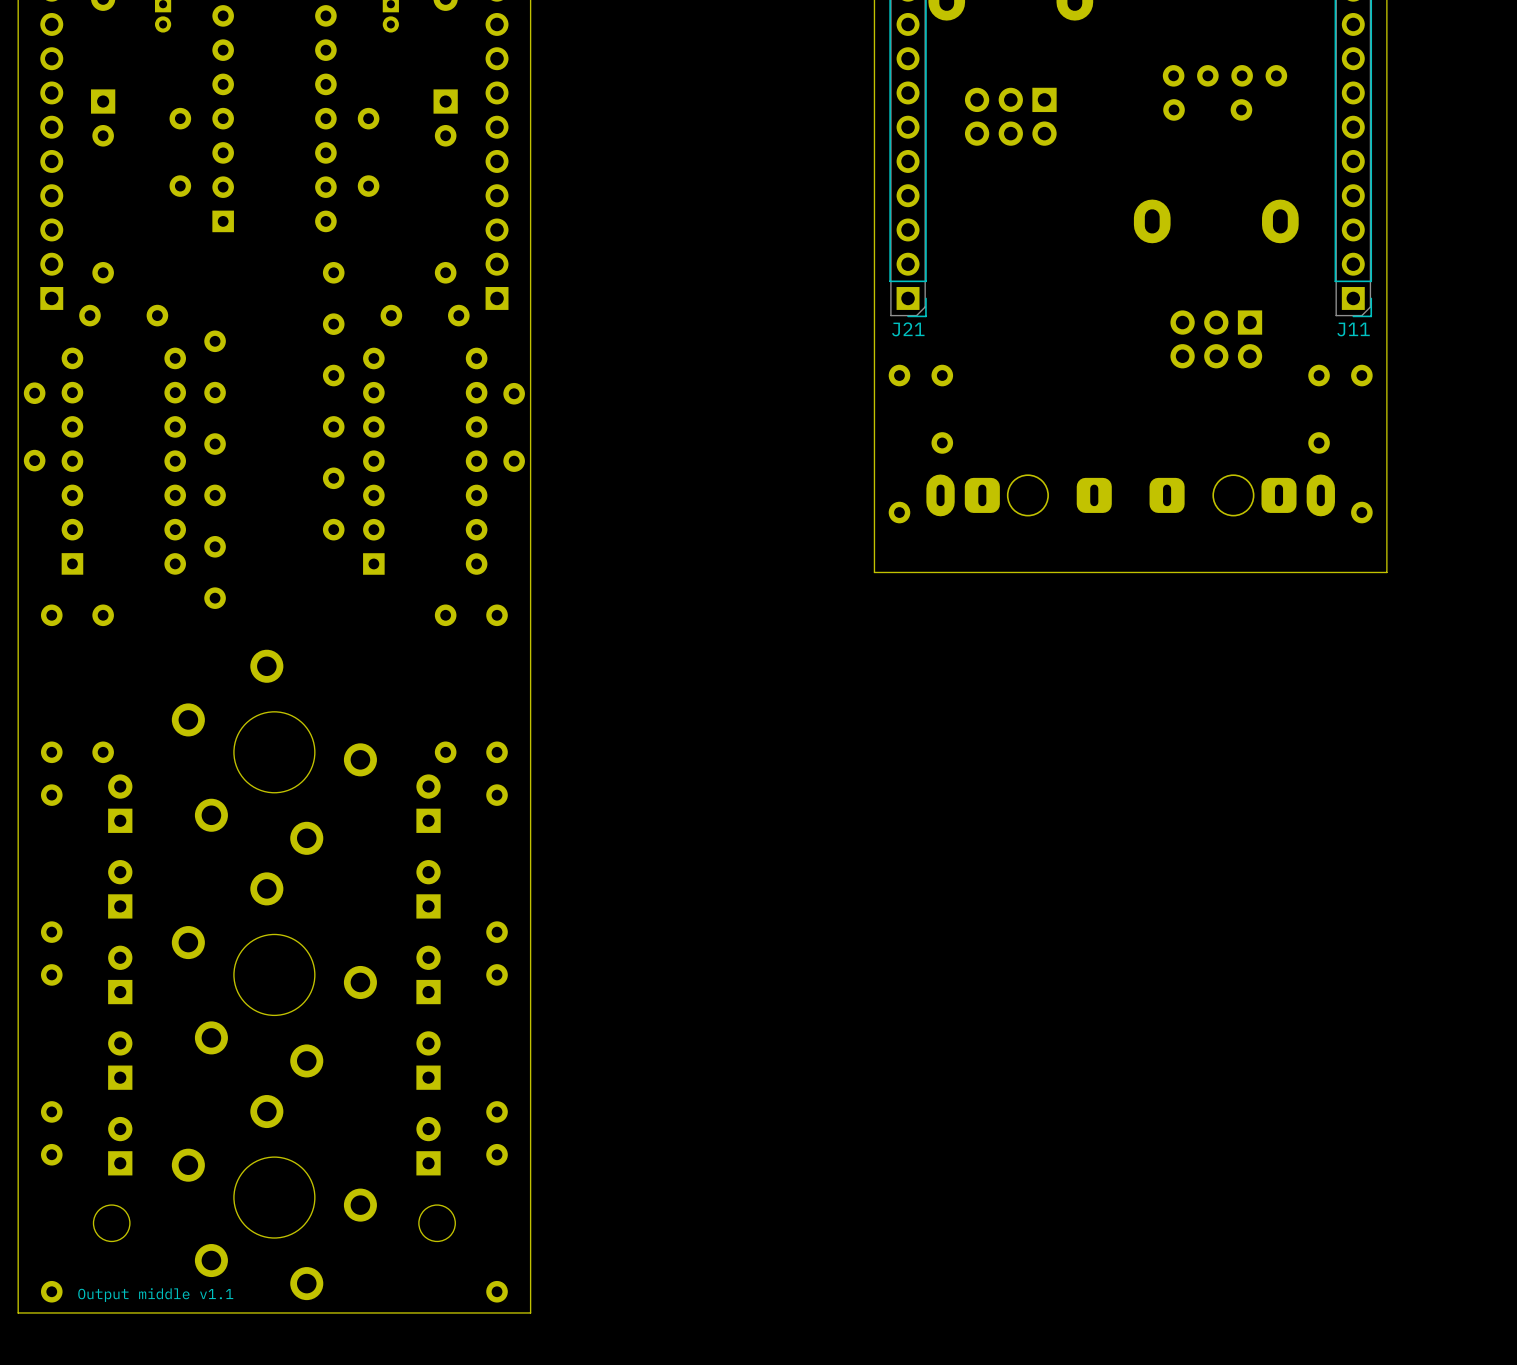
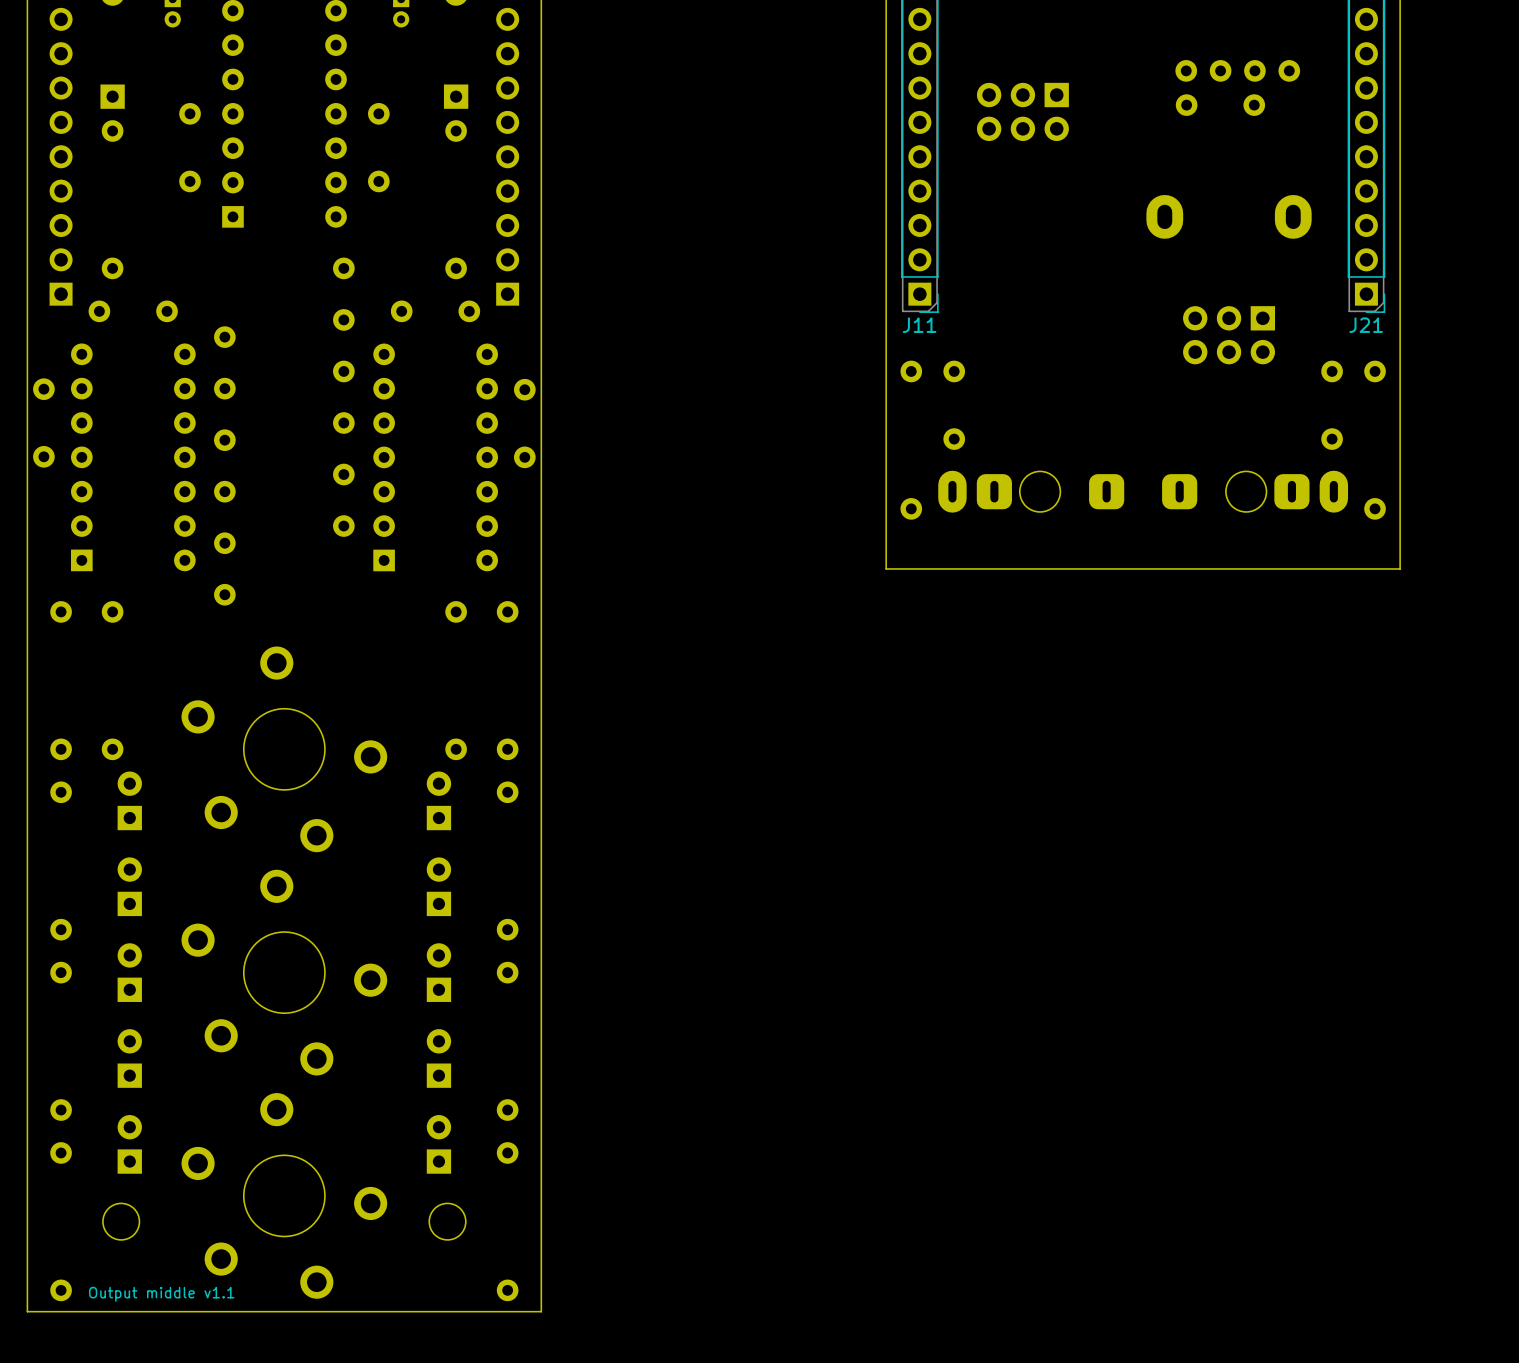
J21 name: J21 (908, 329) -> J11 (919, 325)
J11 name: J11 (1353, 329) -> J21 (1366, 325)

